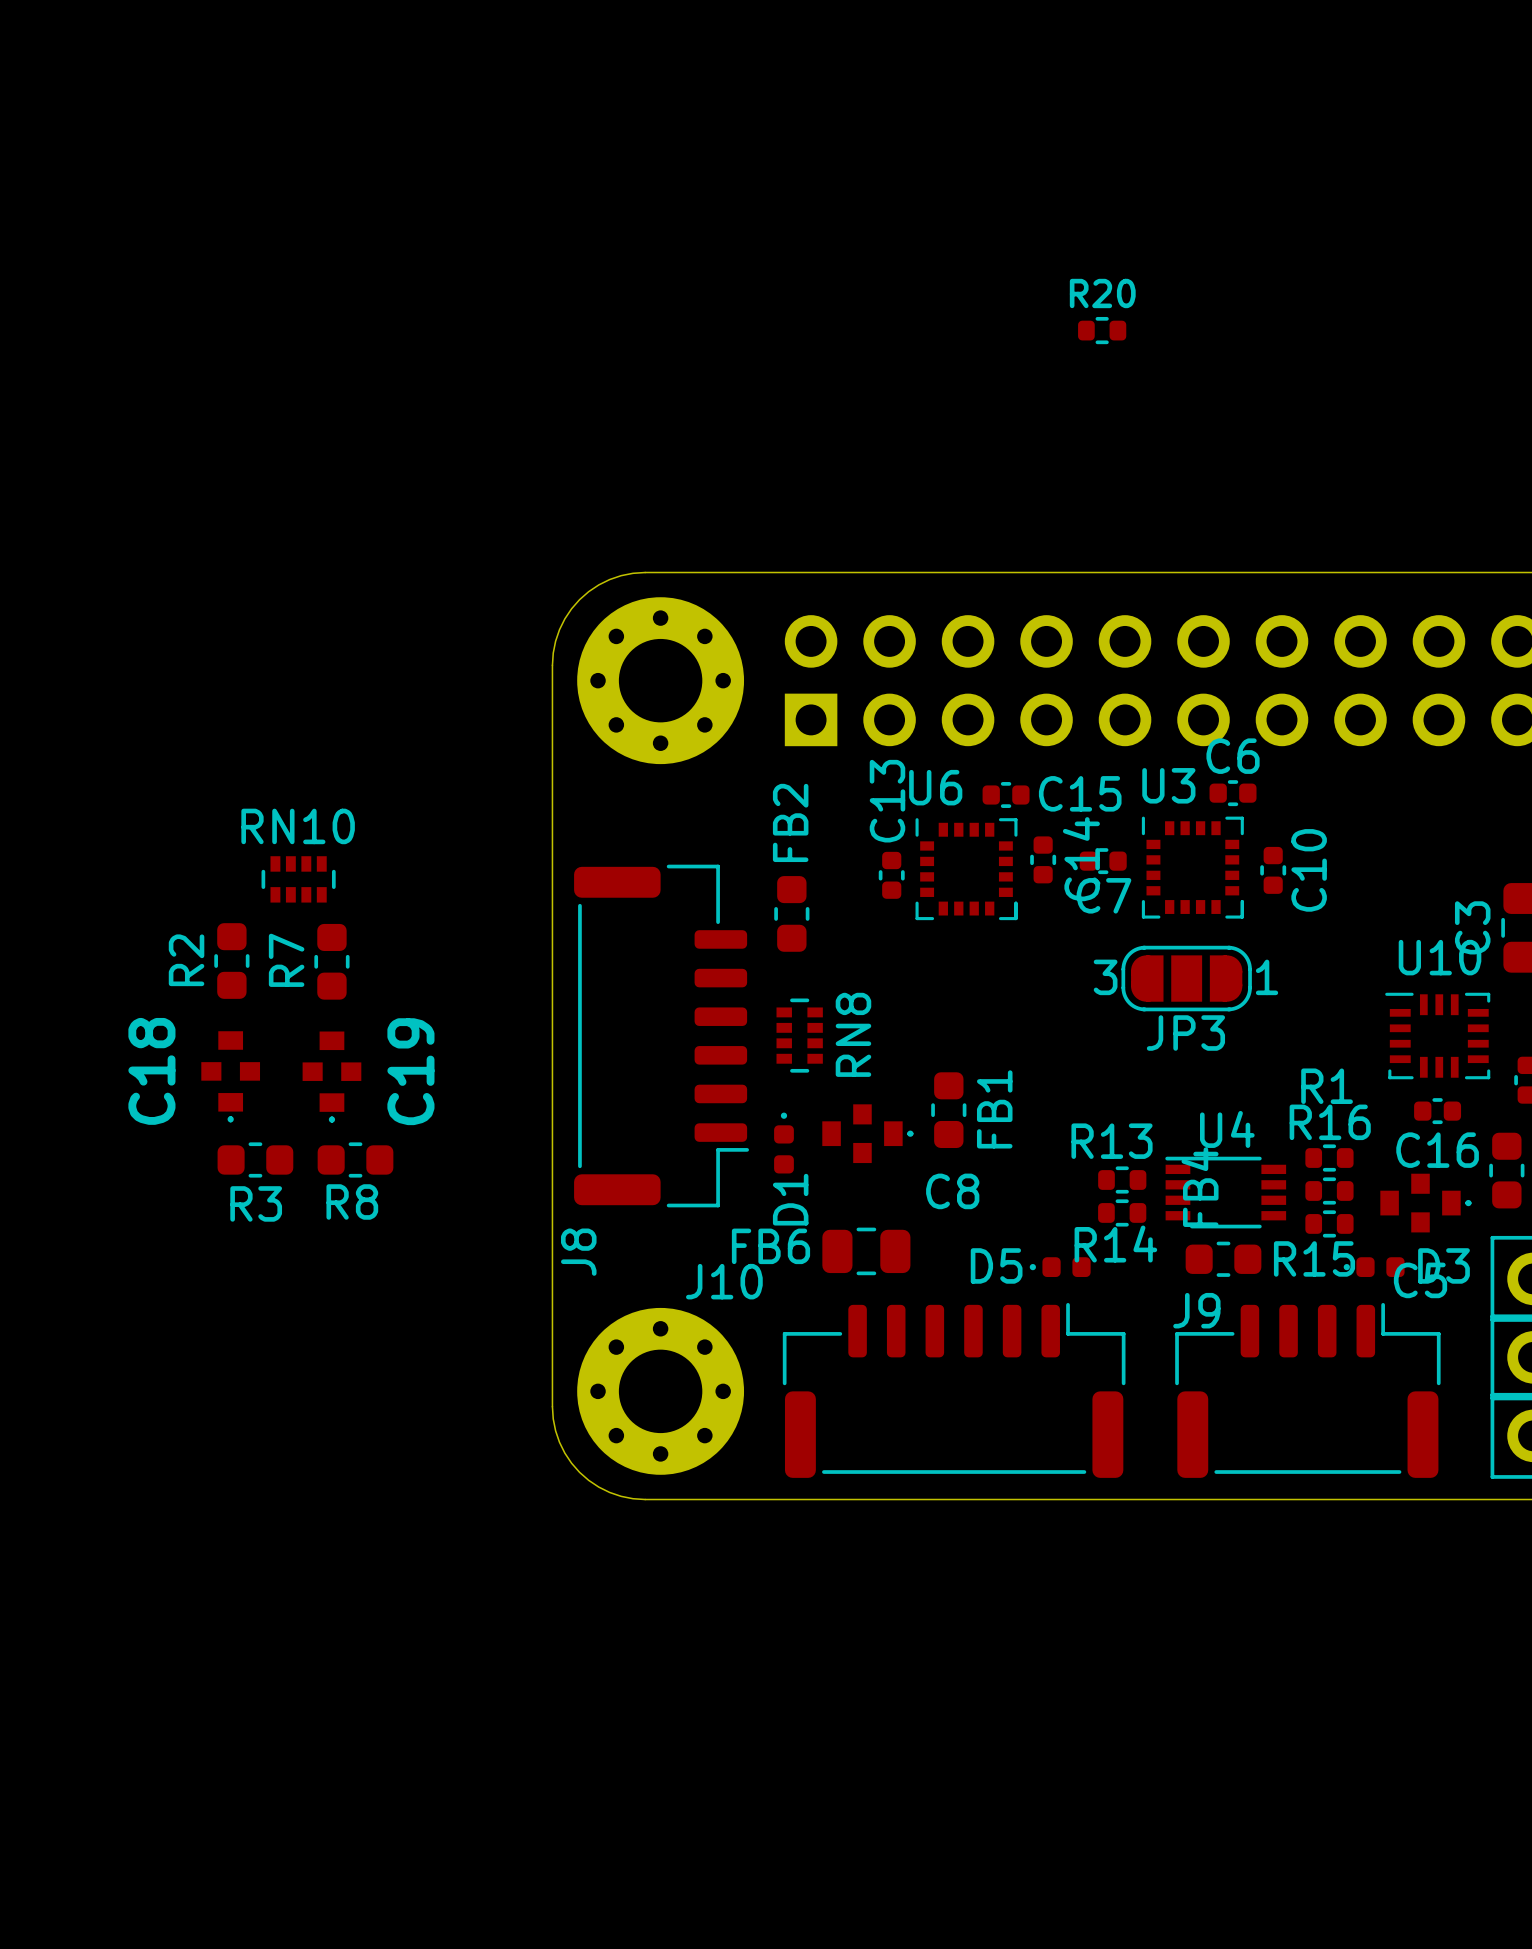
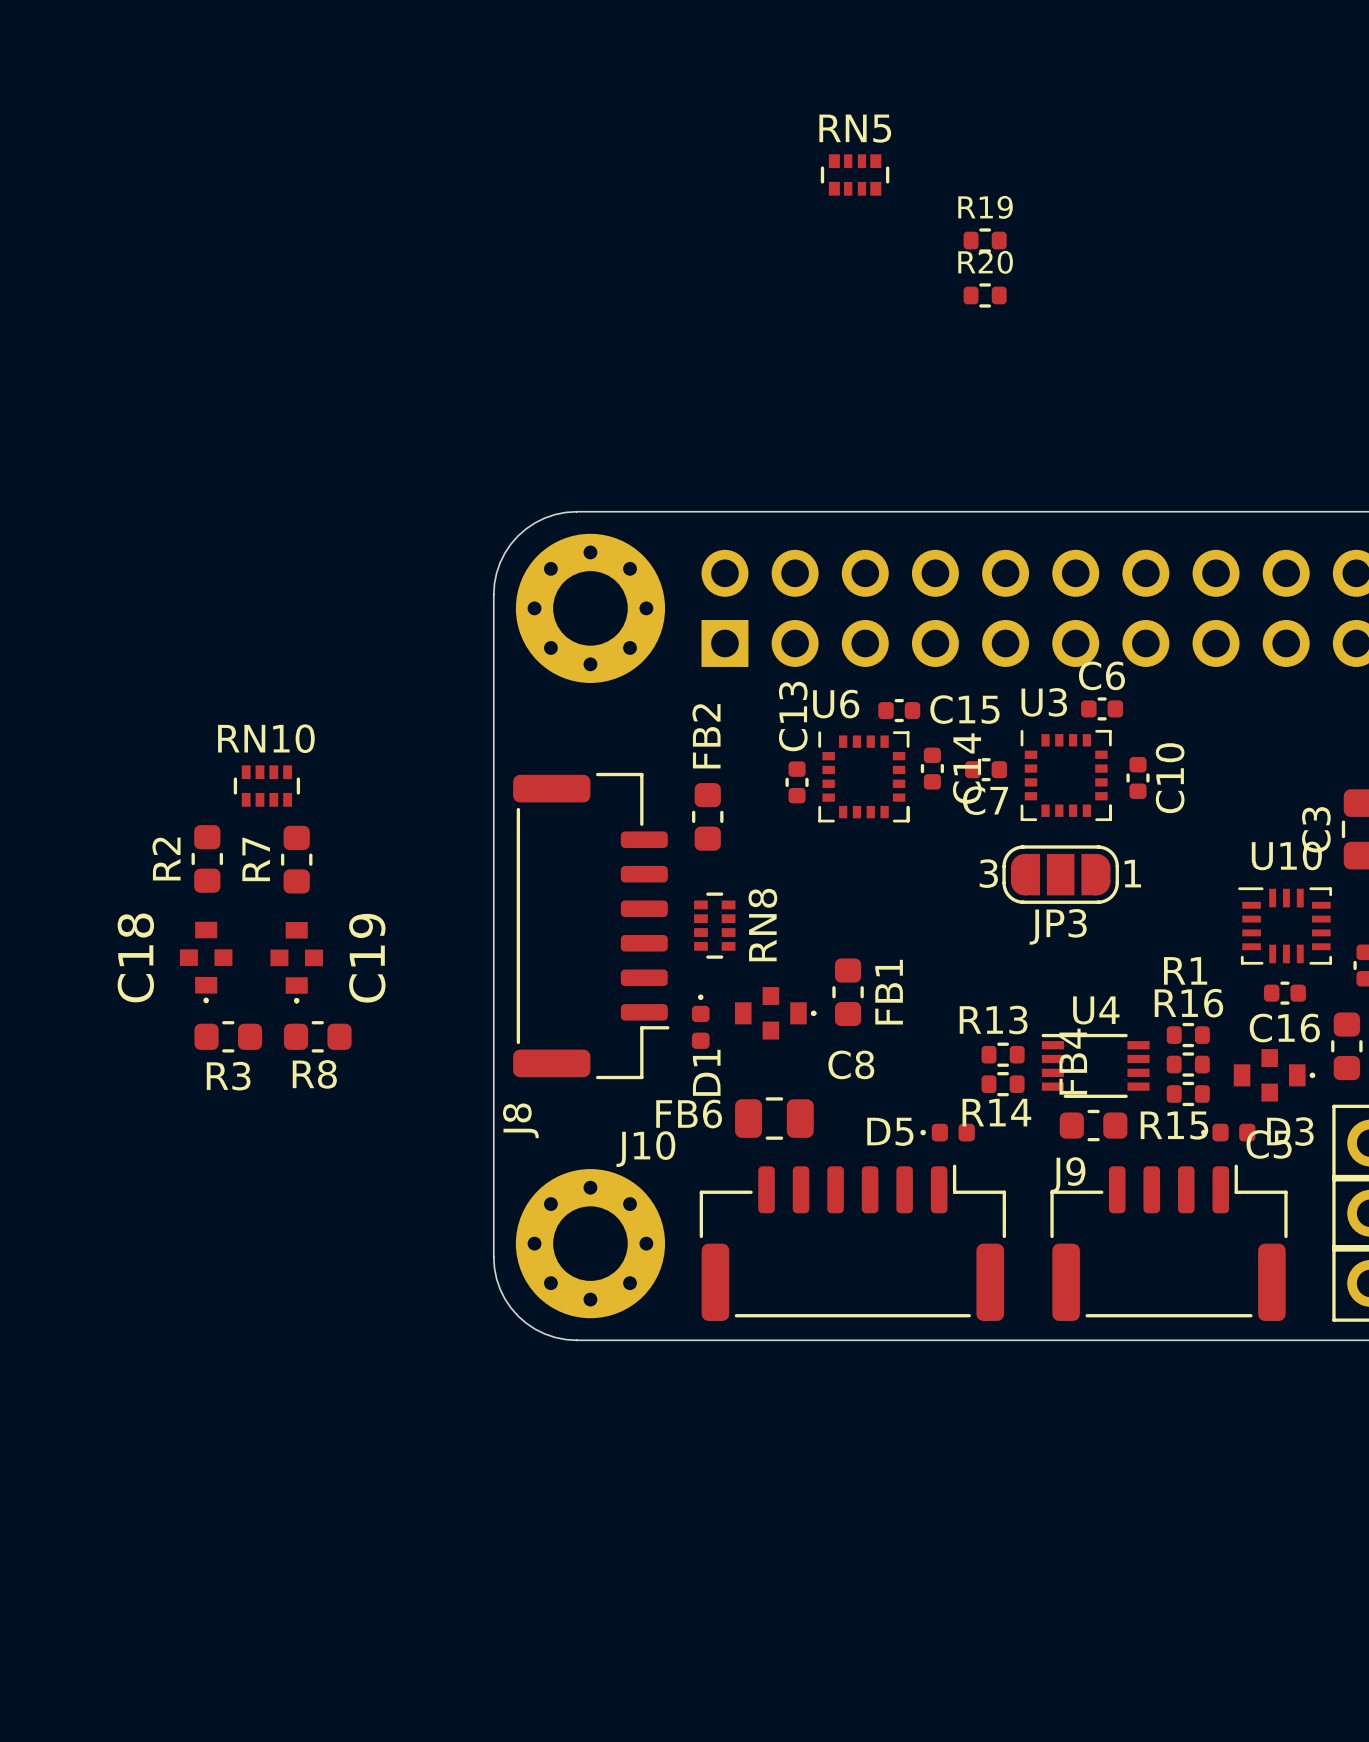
RN5: none -> (855, 174)
R19: none -> (985, 240)

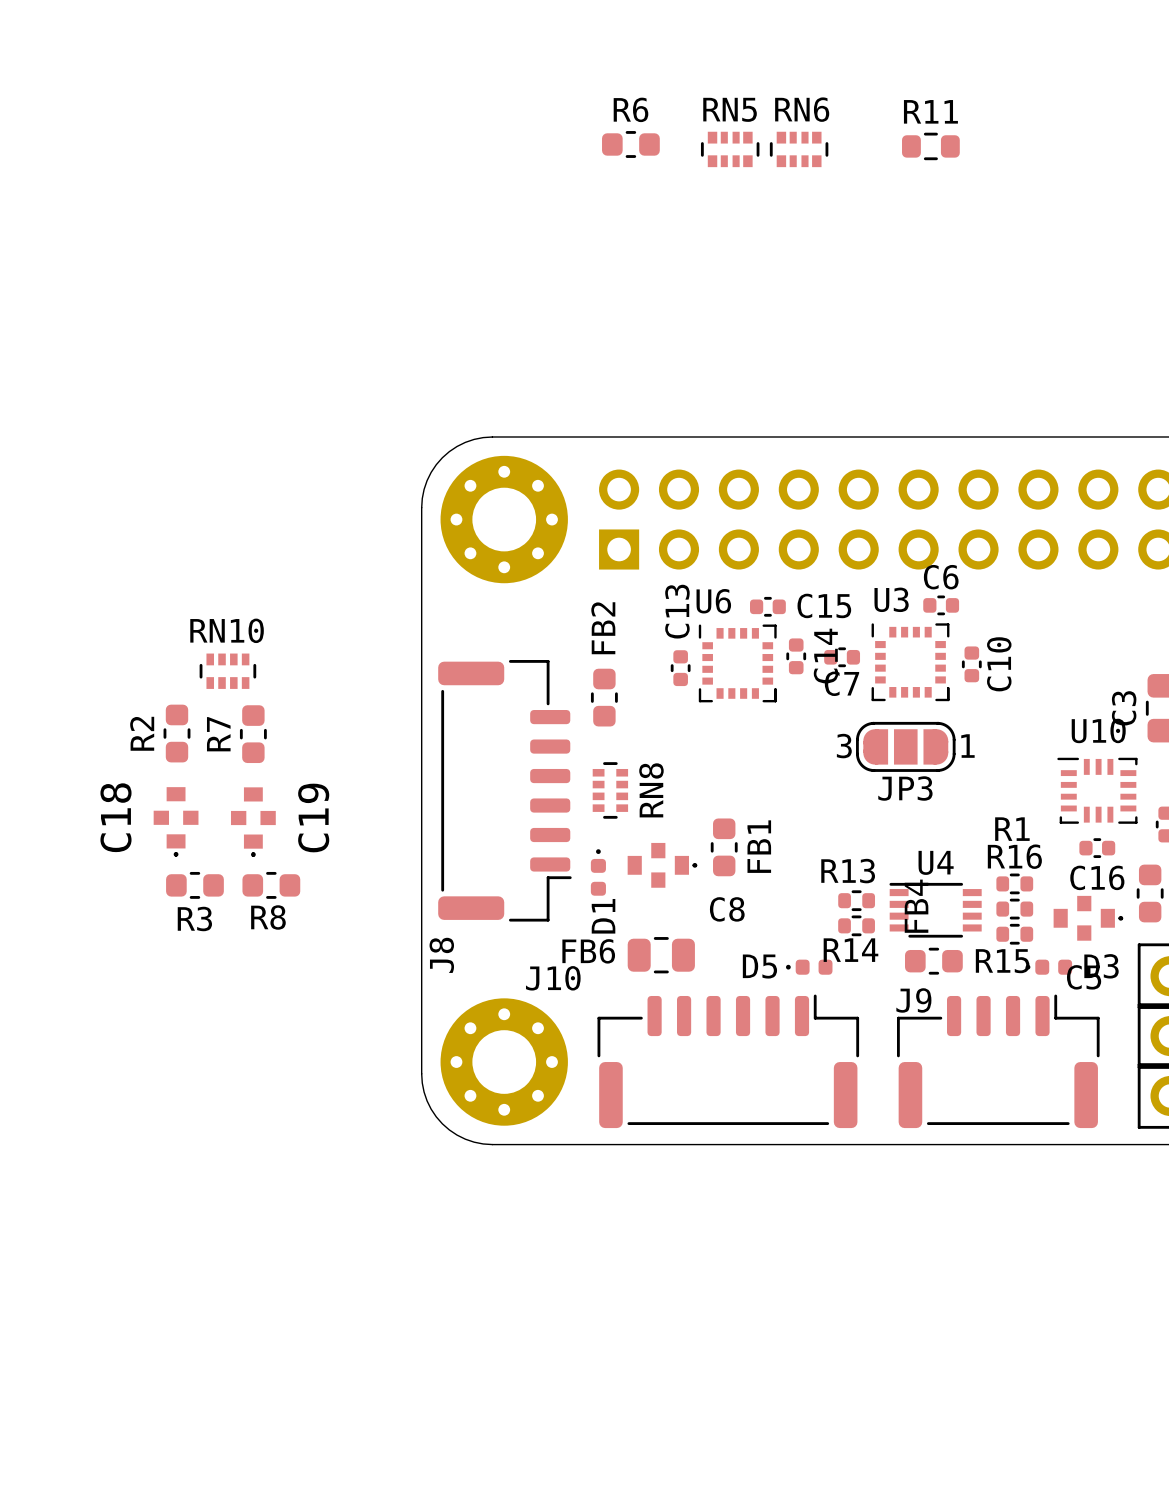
R6: none -> (630, 144)
R11: none -> (930, 146)
RN6: none -> (799, 149)
R19: (985, 240) -> none
R20: (985, 295) -> none

